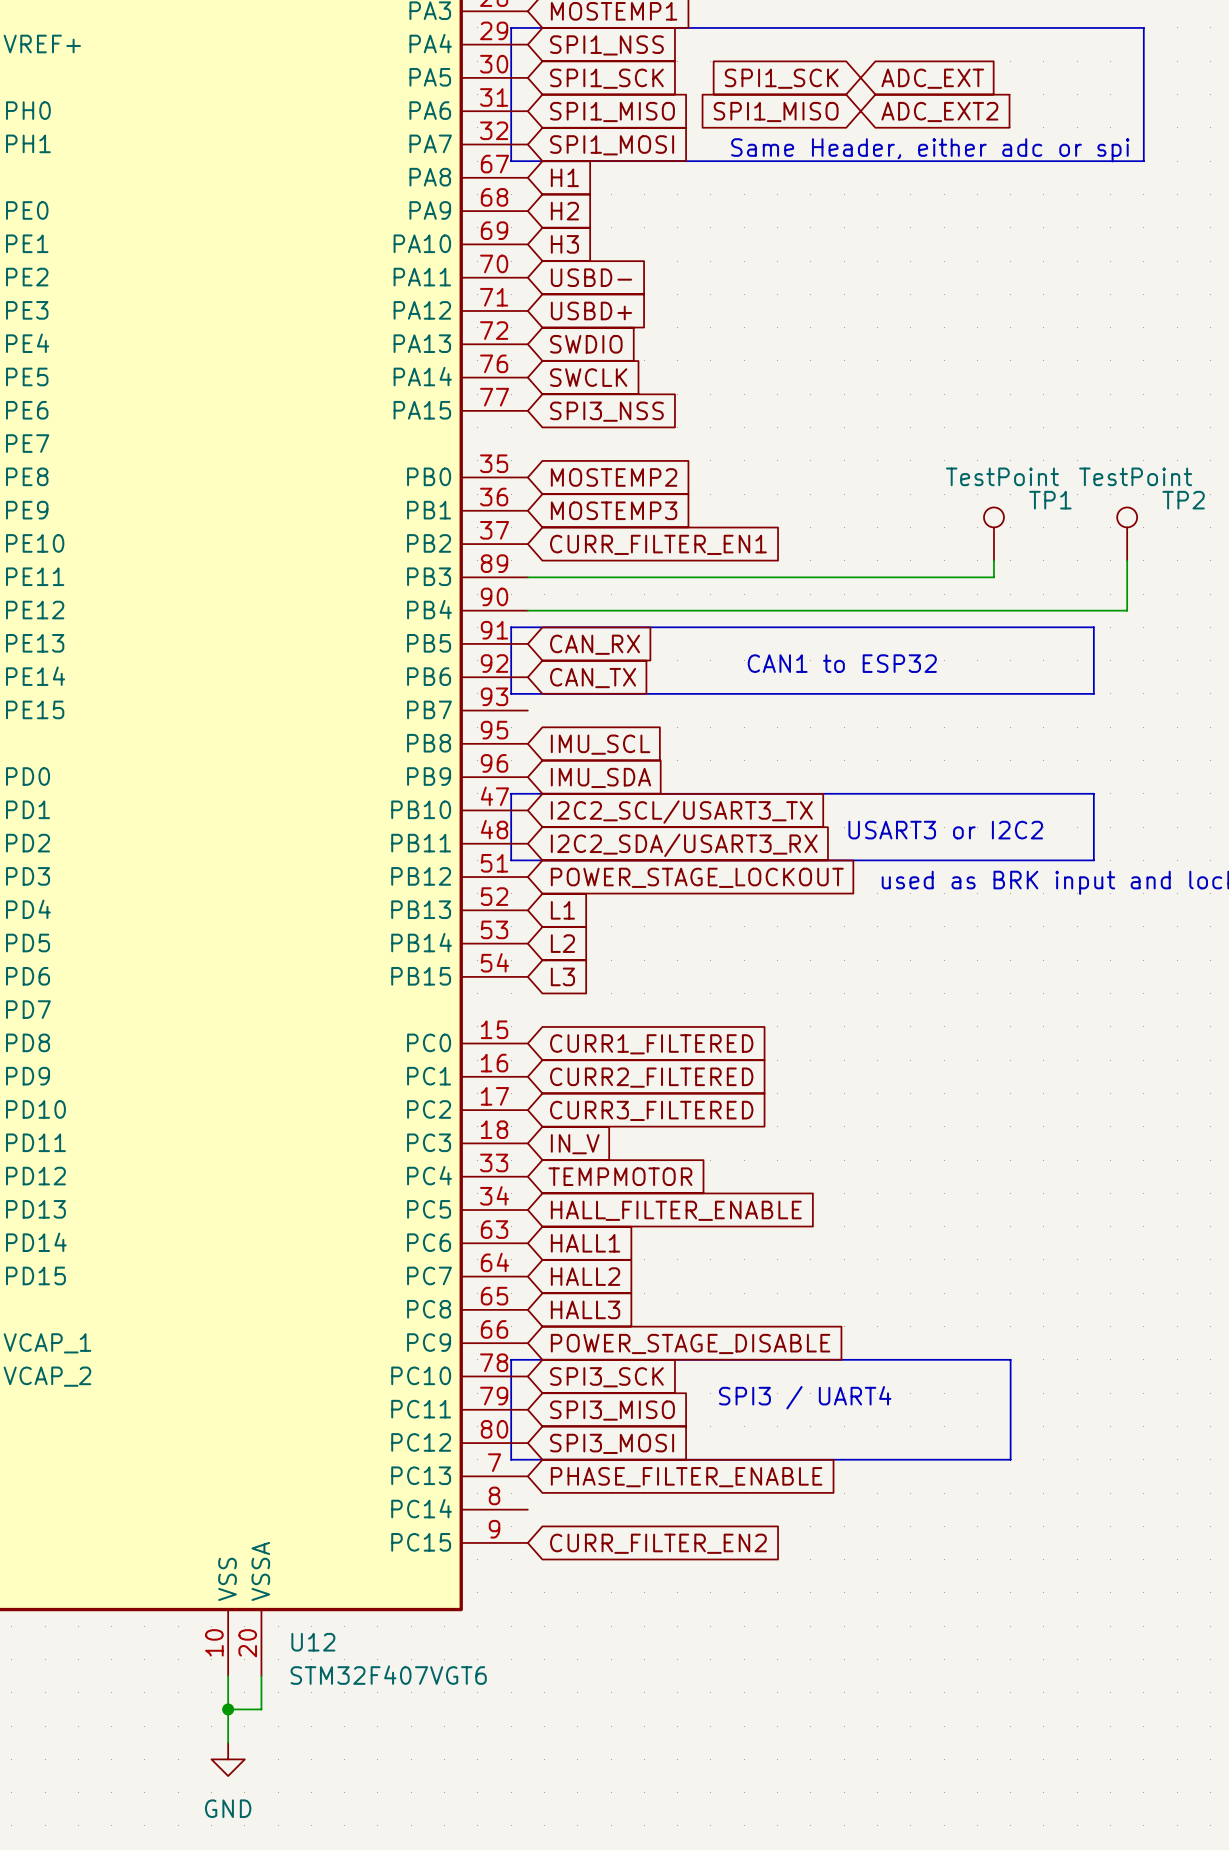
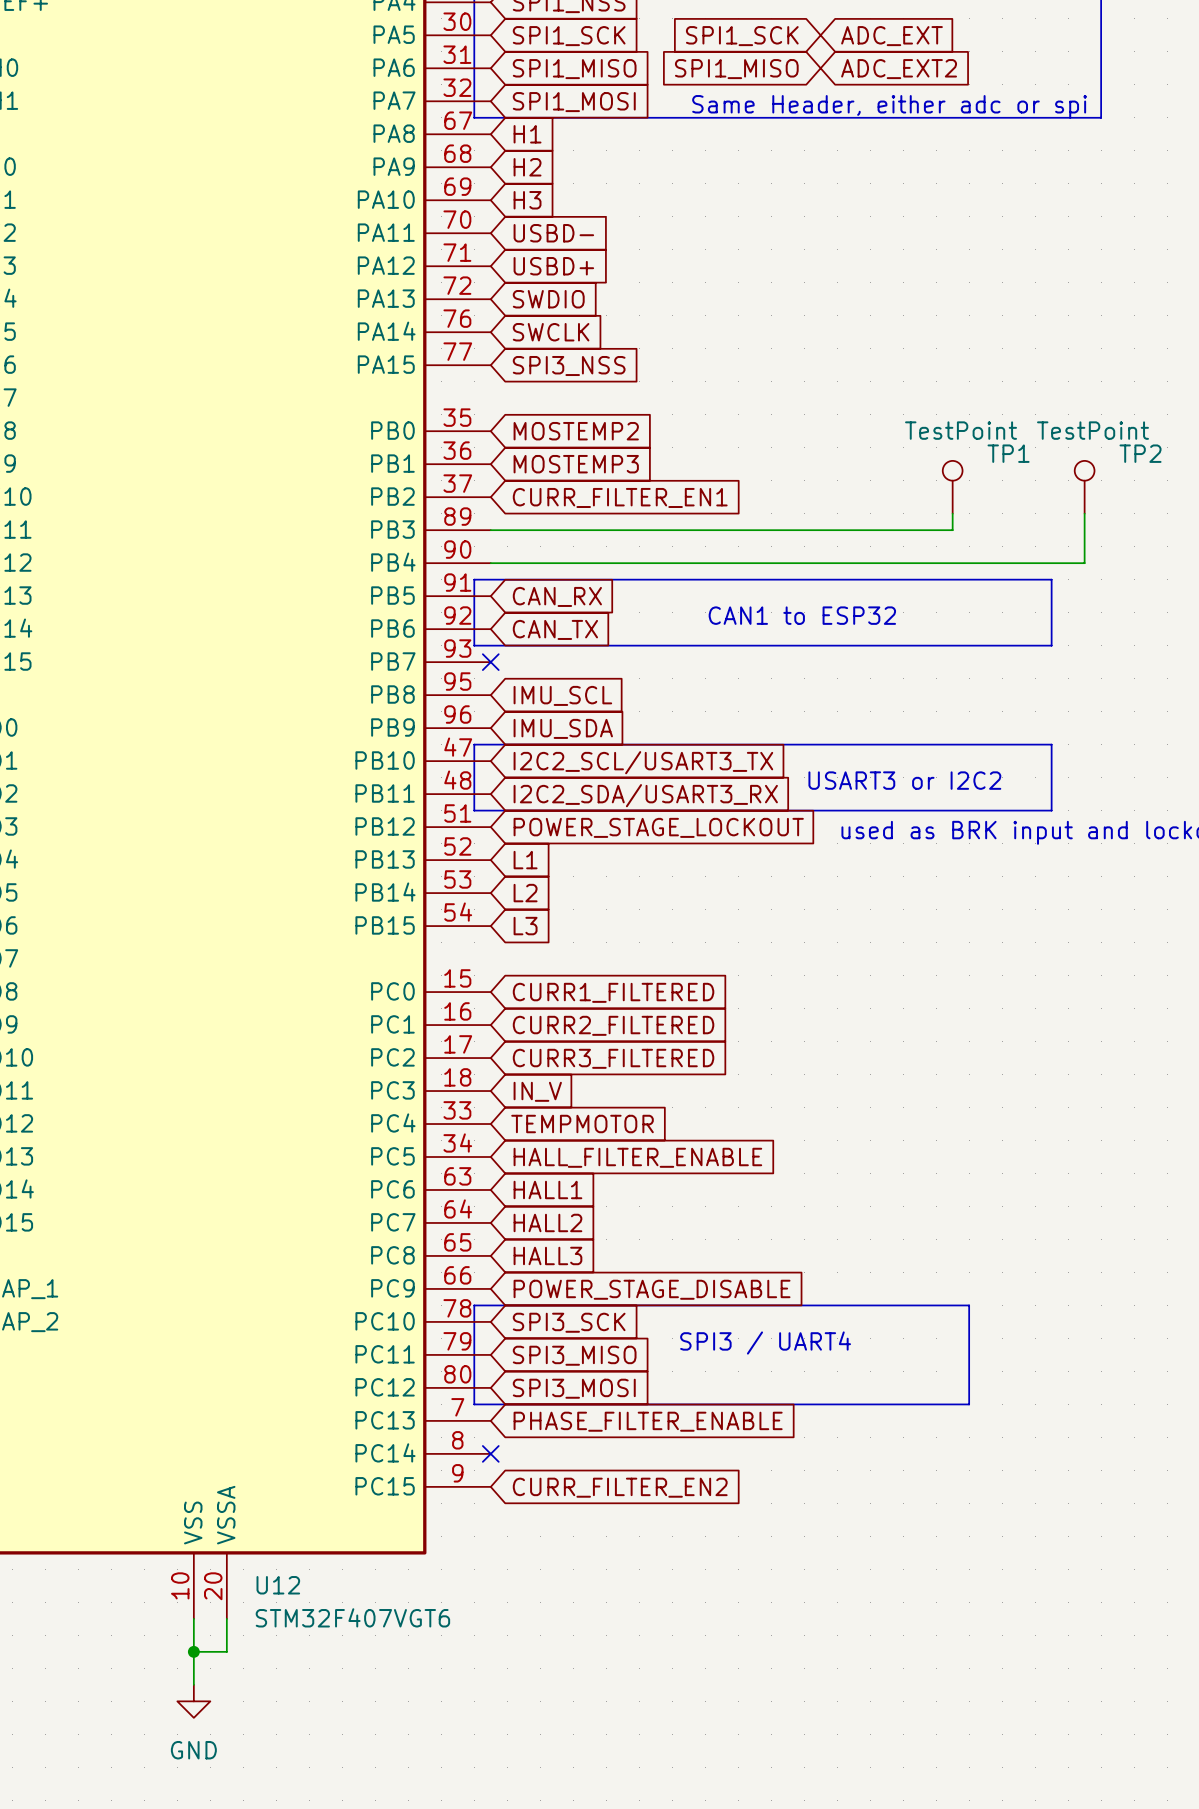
no-connect mark: none -> (490, 662)
no-connect mark: none -> (490, 1453)

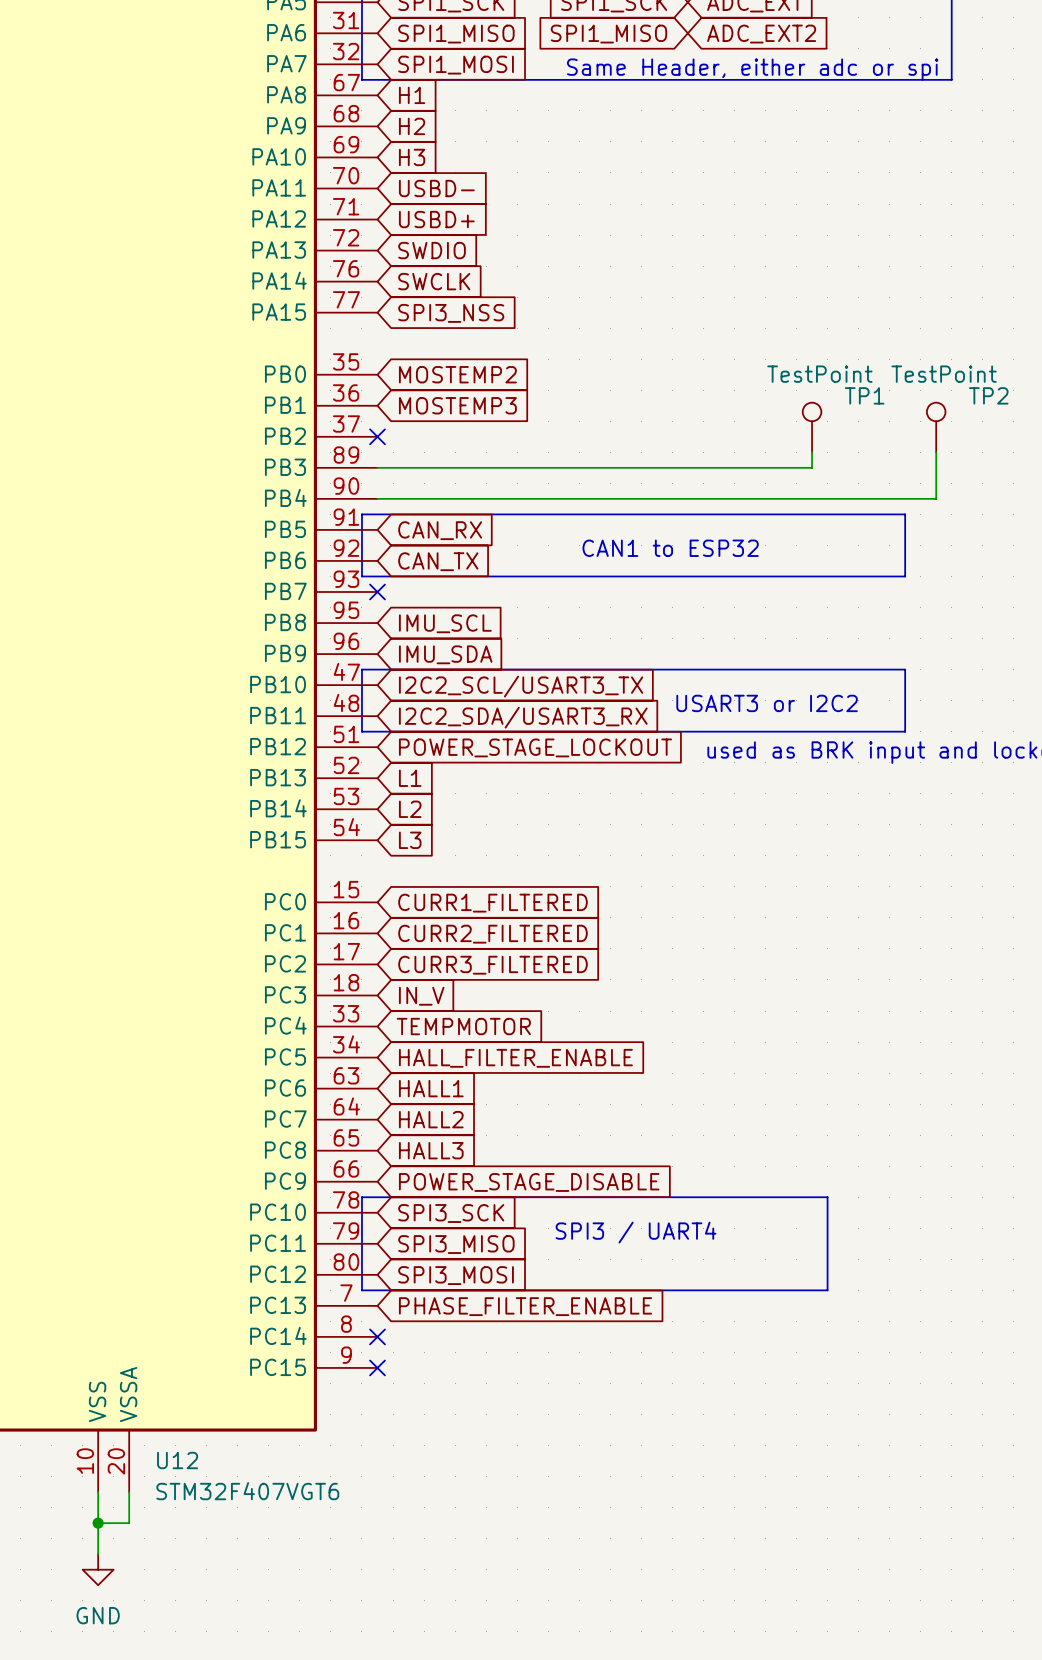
no-connect mark: none -> (377, 436)
global label: CURR_FILTER_EN1 (620, 497) -> none
no-connect mark: none -> (377, 1367)
global label: CURR_FILTER_EN2 (620, 1487) -> none

